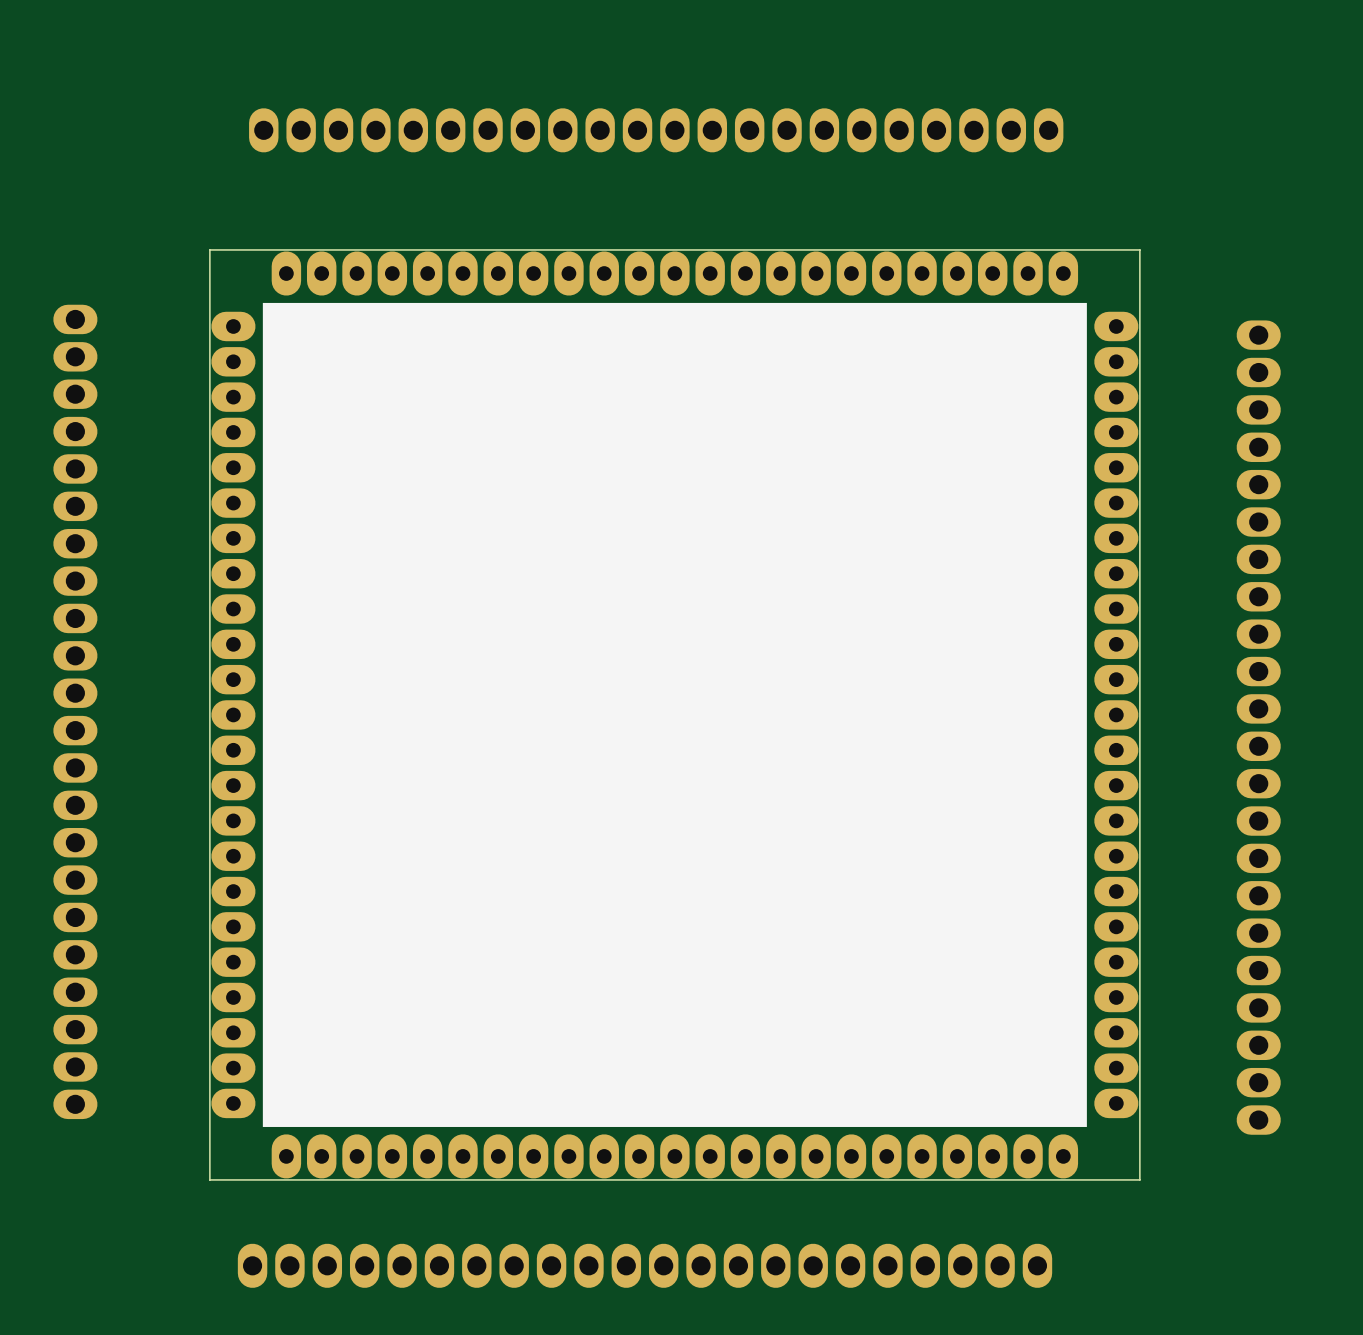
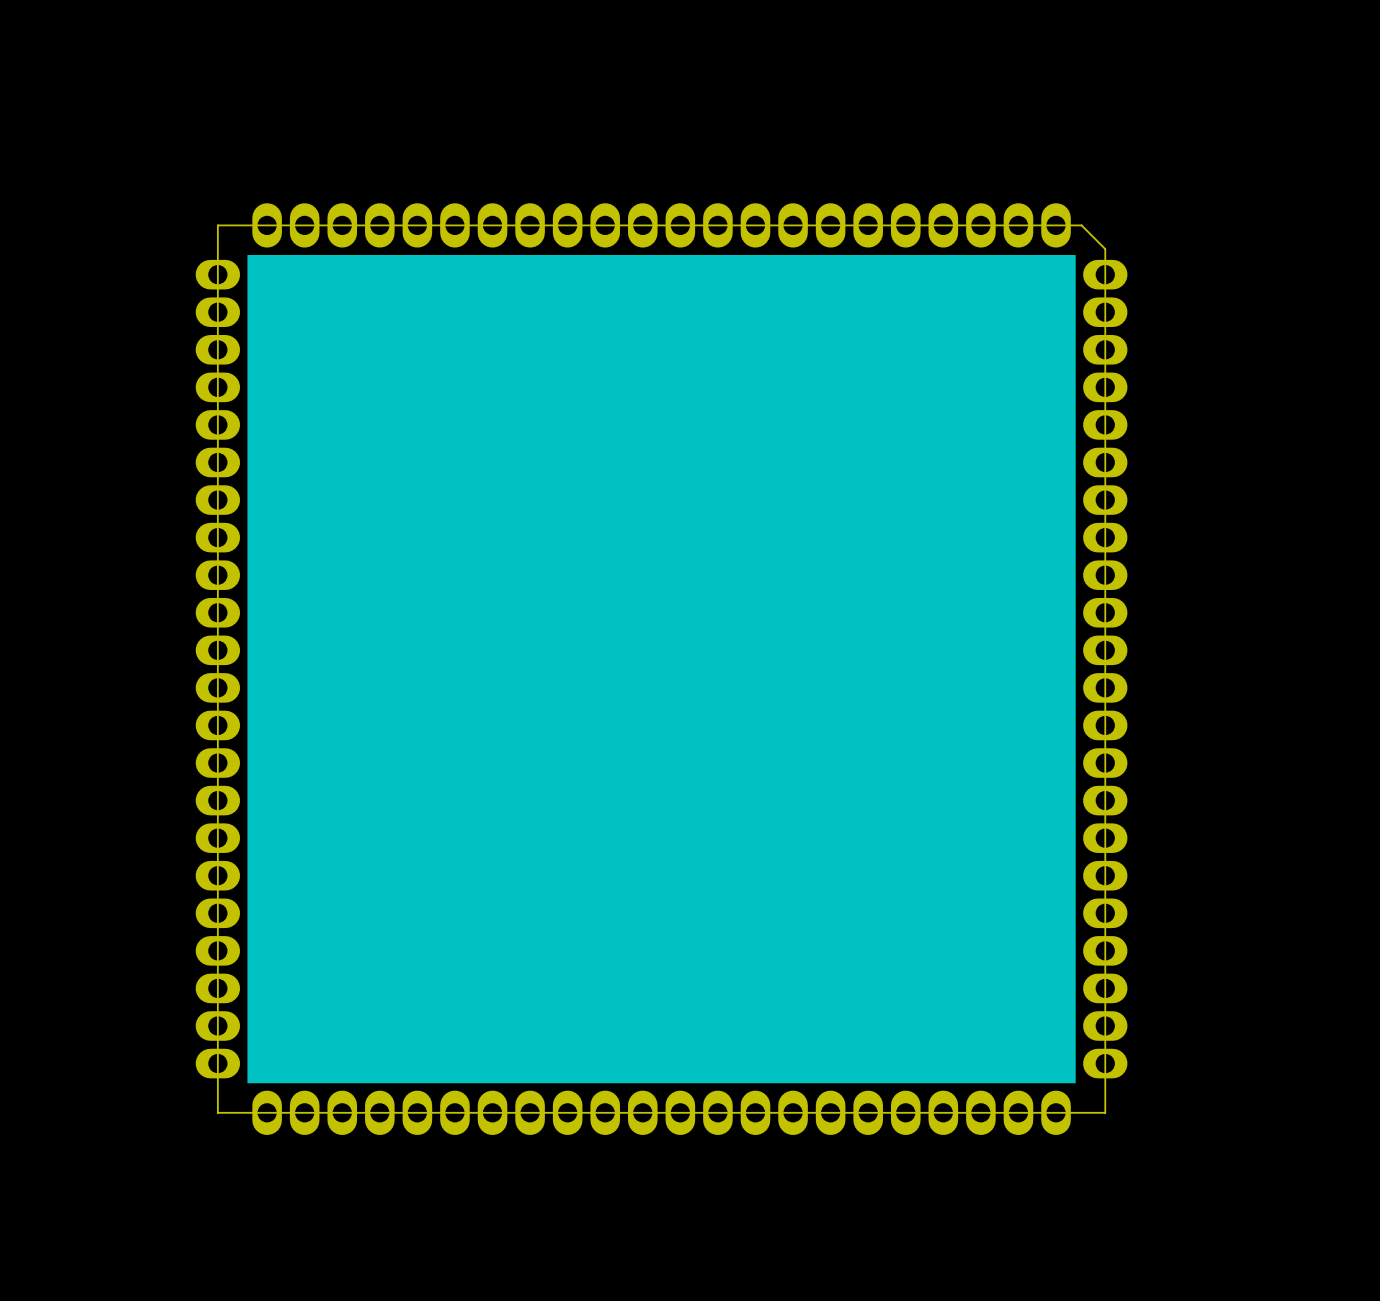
part: (656, 130) -> none
board edge: (1139, 249) (1139, 1179) (209, 1179) (209, 249) (1139, 249) -> (1081, 225) (1105, 249) (1105, 1112) (217, 1112) (217, 225) (1081, 225)
part footprint: [271, 251, 1079, 296] -> [252, 203, 1071, 248]
part footprint: [211, 311, 256, 1119] -> [195, 259, 241, 1079]
part footprint: [1094, 311, 1139, 1119] -> [1083, 259, 1128, 1079]
part: (75, 711) -> none
part: (1258, 727) -> none
part footprint: [271, 1134, 1079, 1179] -> [252, 1090, 1071, 1136]
part: (645, 1265) -> none

